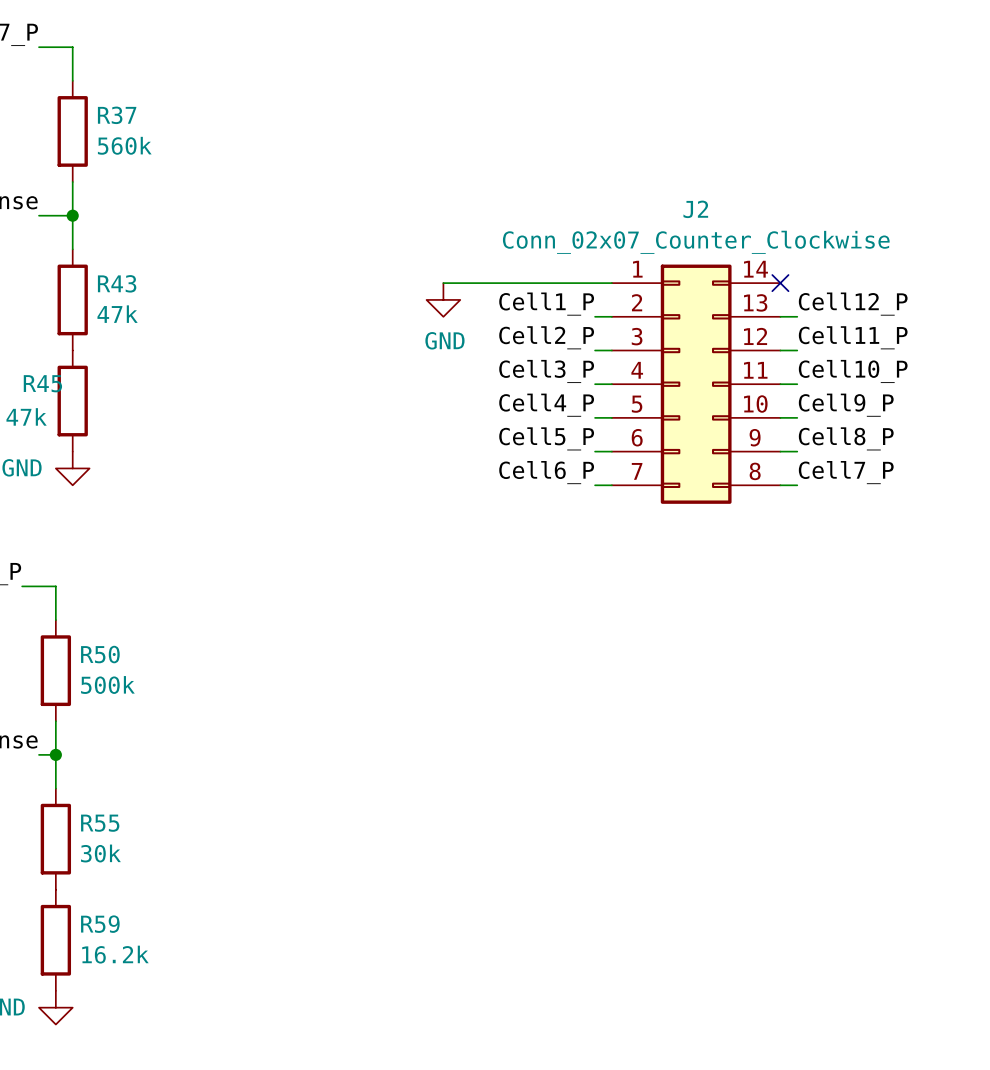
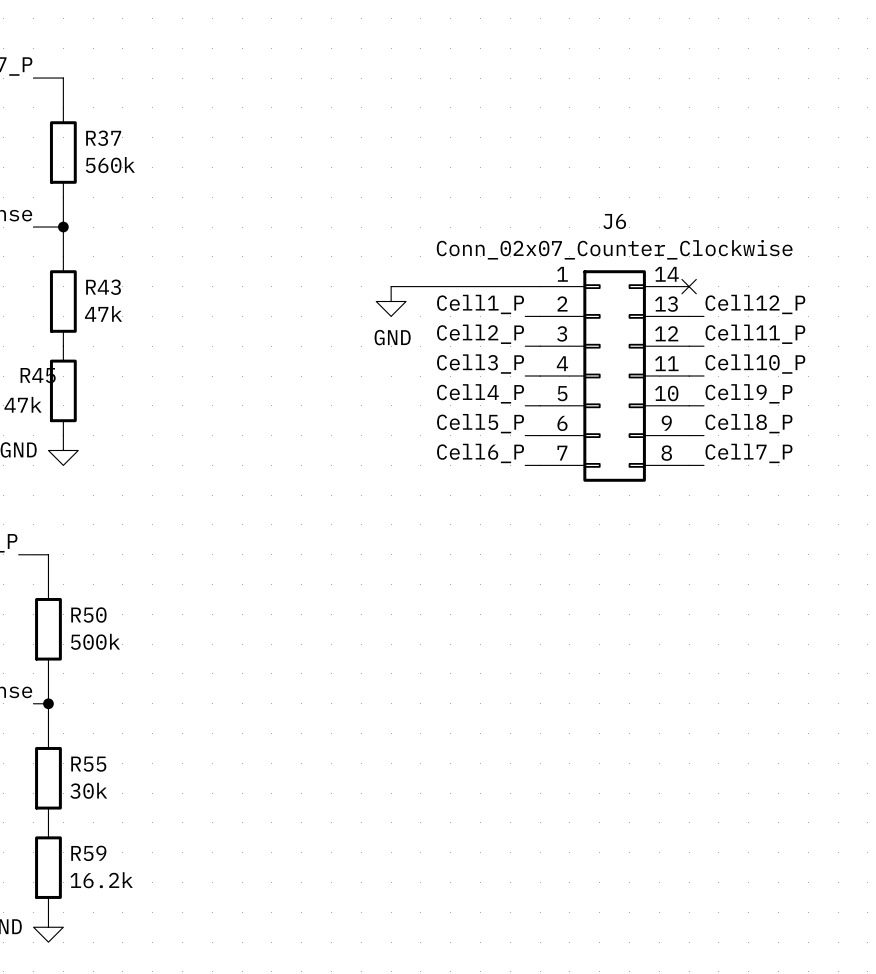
J2 name: J2 (695, 209) -> J6 (614, 221)

